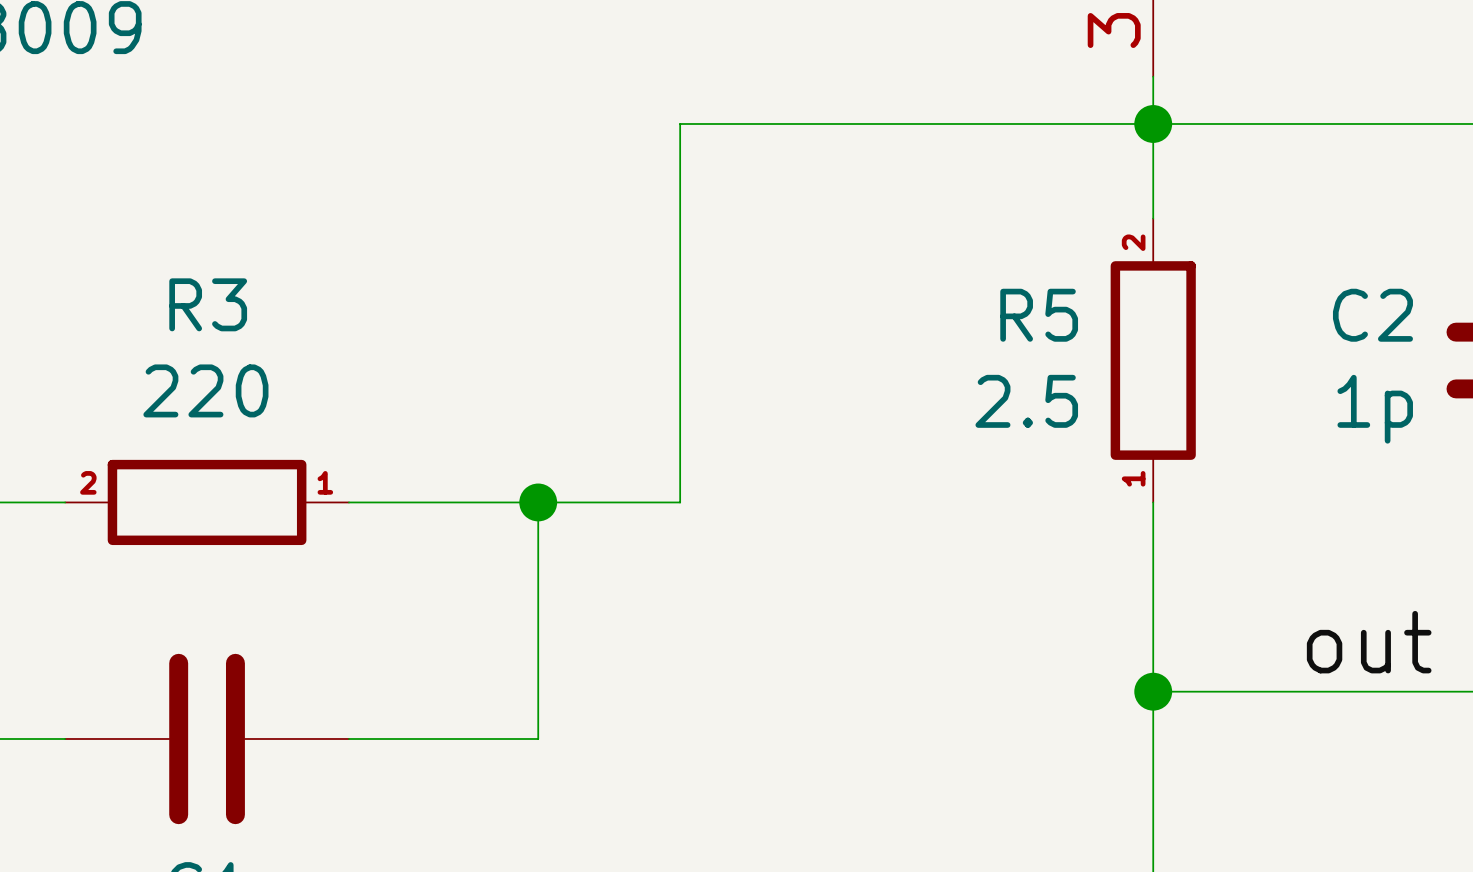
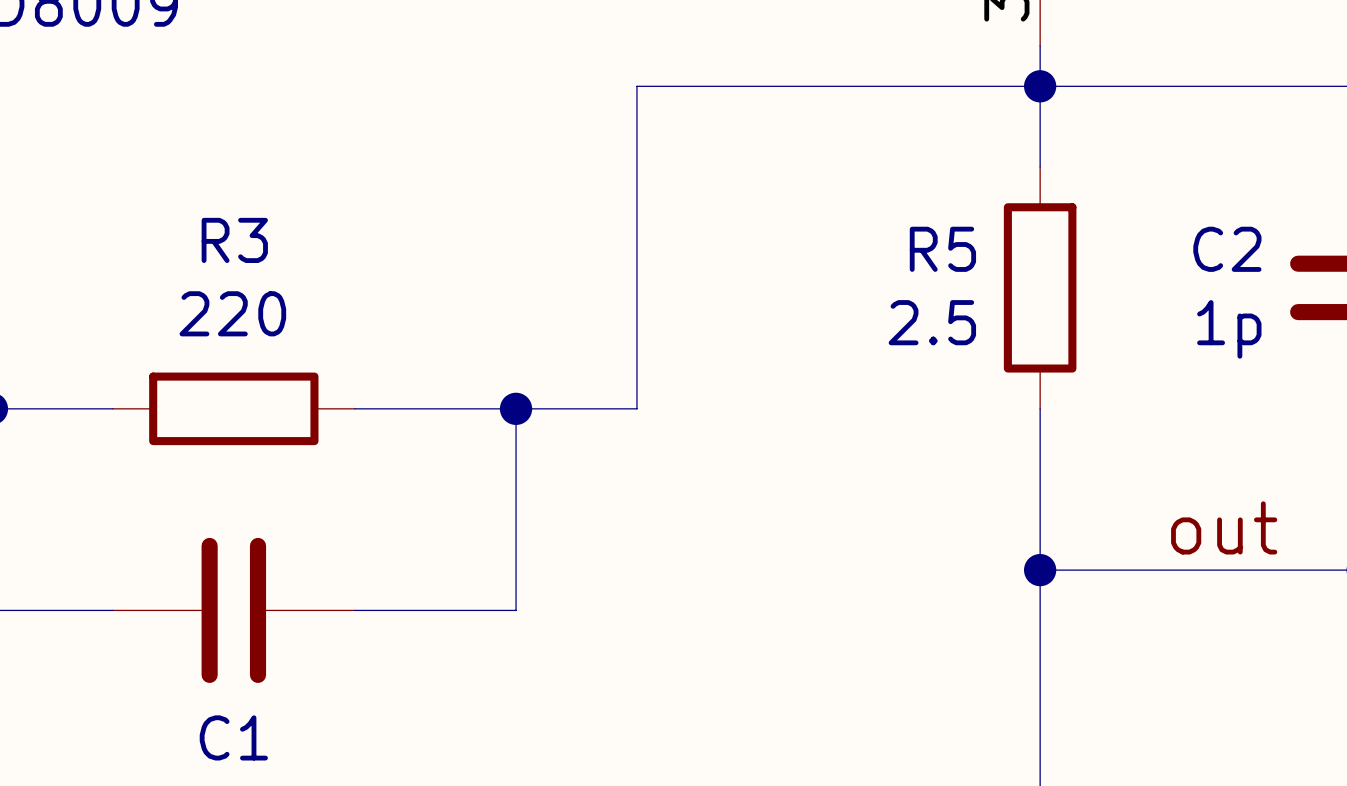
R5 pin number: 2 (1133, 242) -> none
R5 pin number: 1 (1133, 478) -> none
R3 pin number: 2 (88, 482) -> none
R3 pin number: 1 (325, 482) -> none

